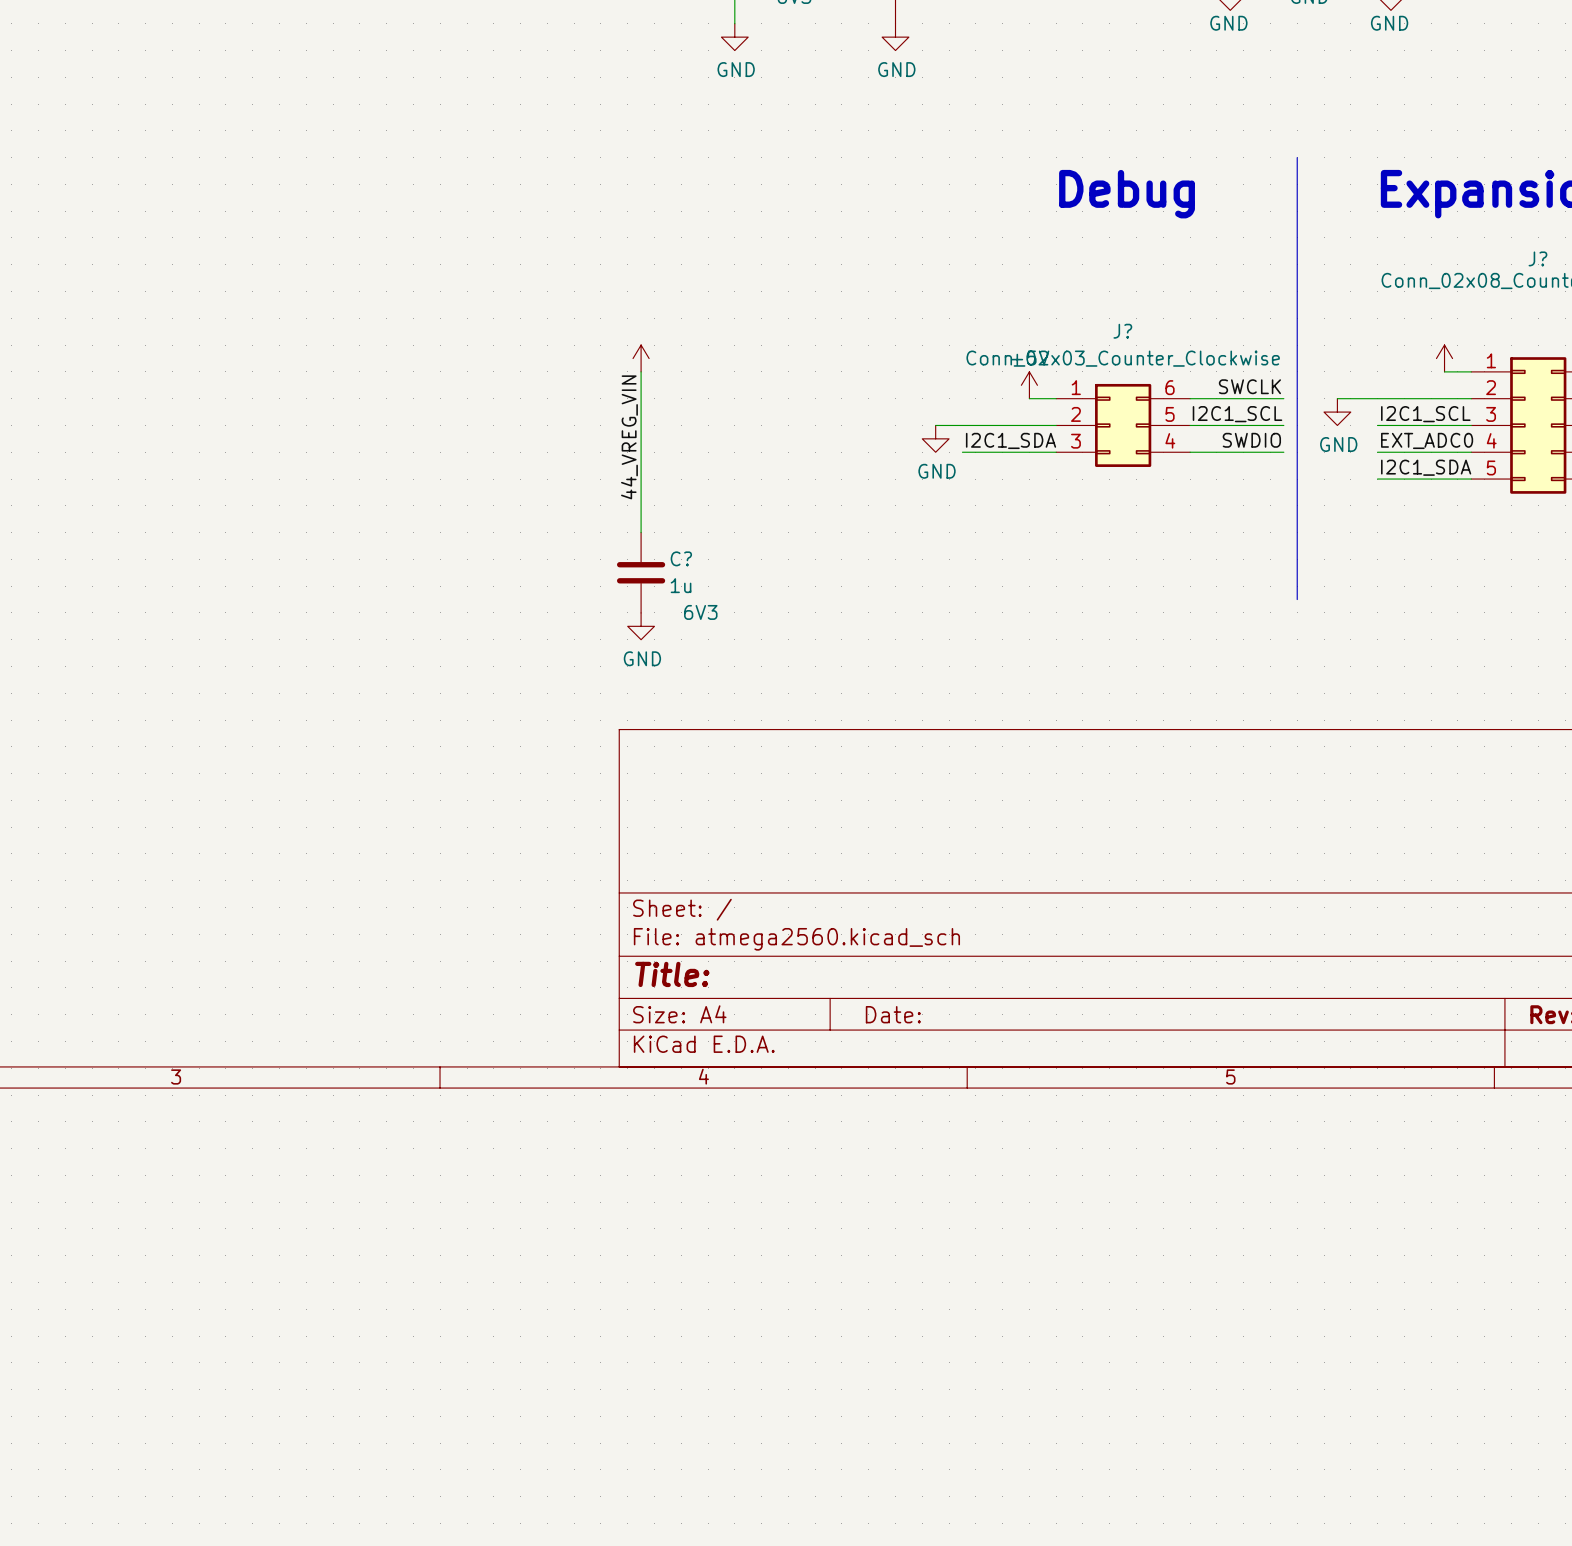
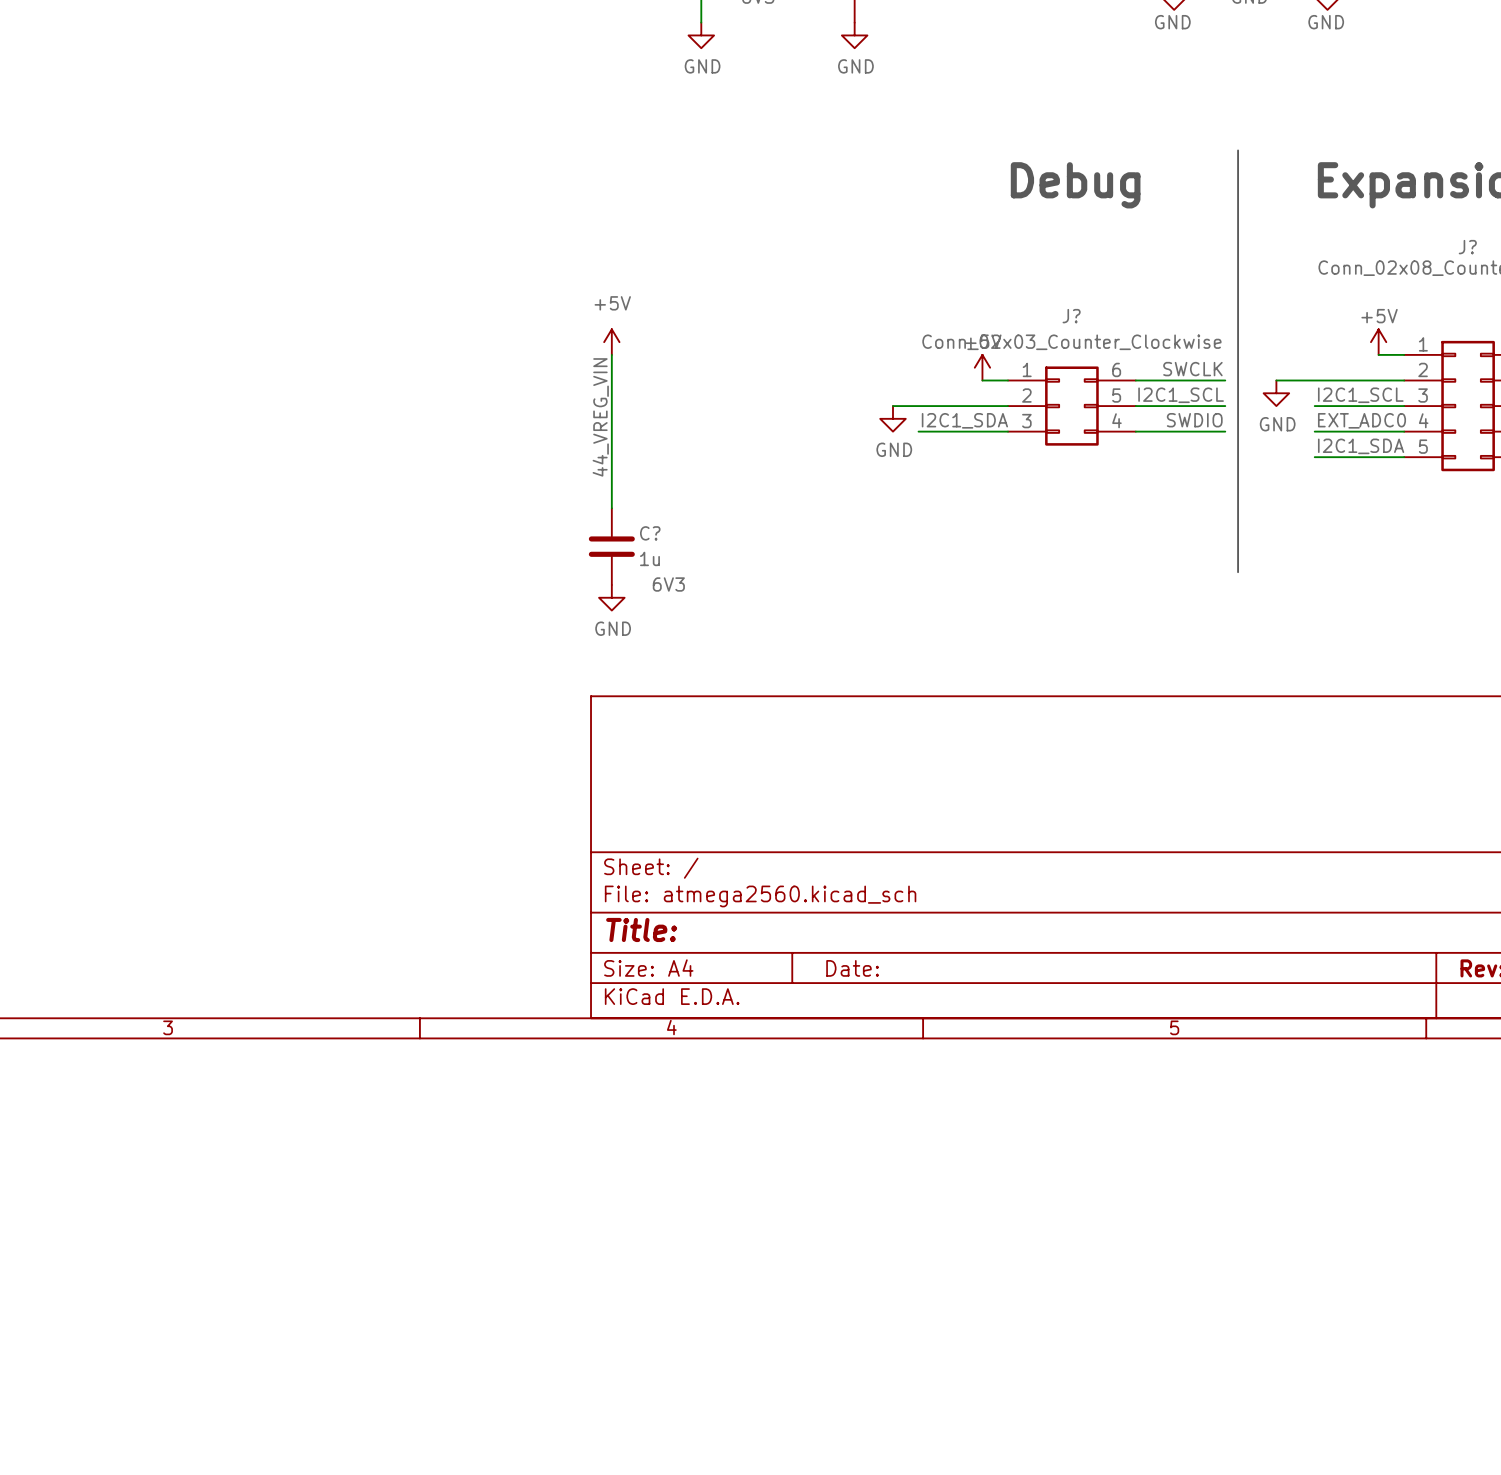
power symbol text: none -> +5V (612, 303)
power symbol text: none -> +5V (1379, 316)

